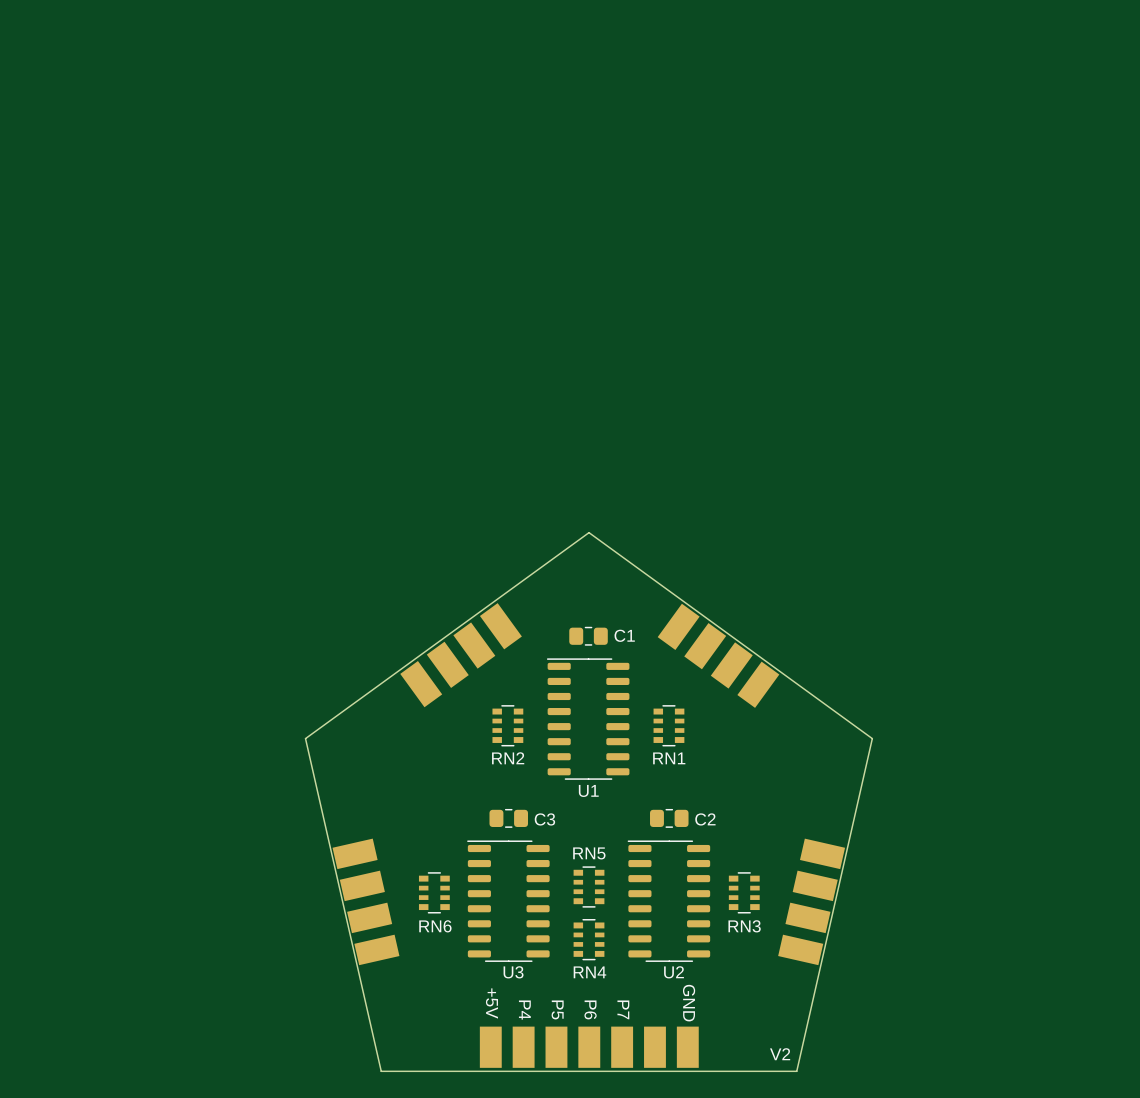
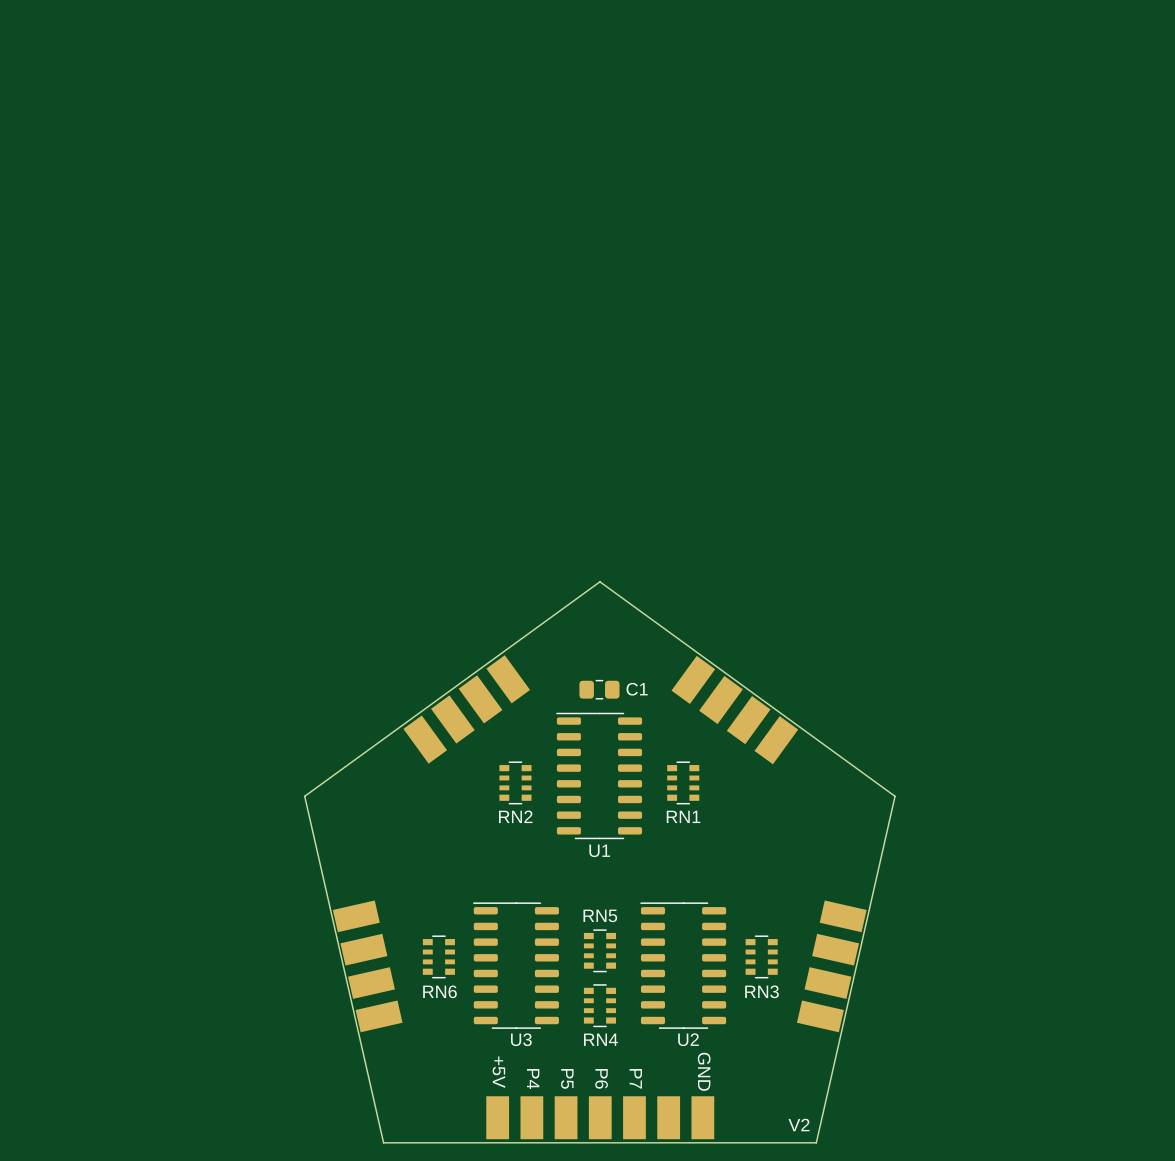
C3: (508, 818) -> none
C2: (669, 818) -> none

